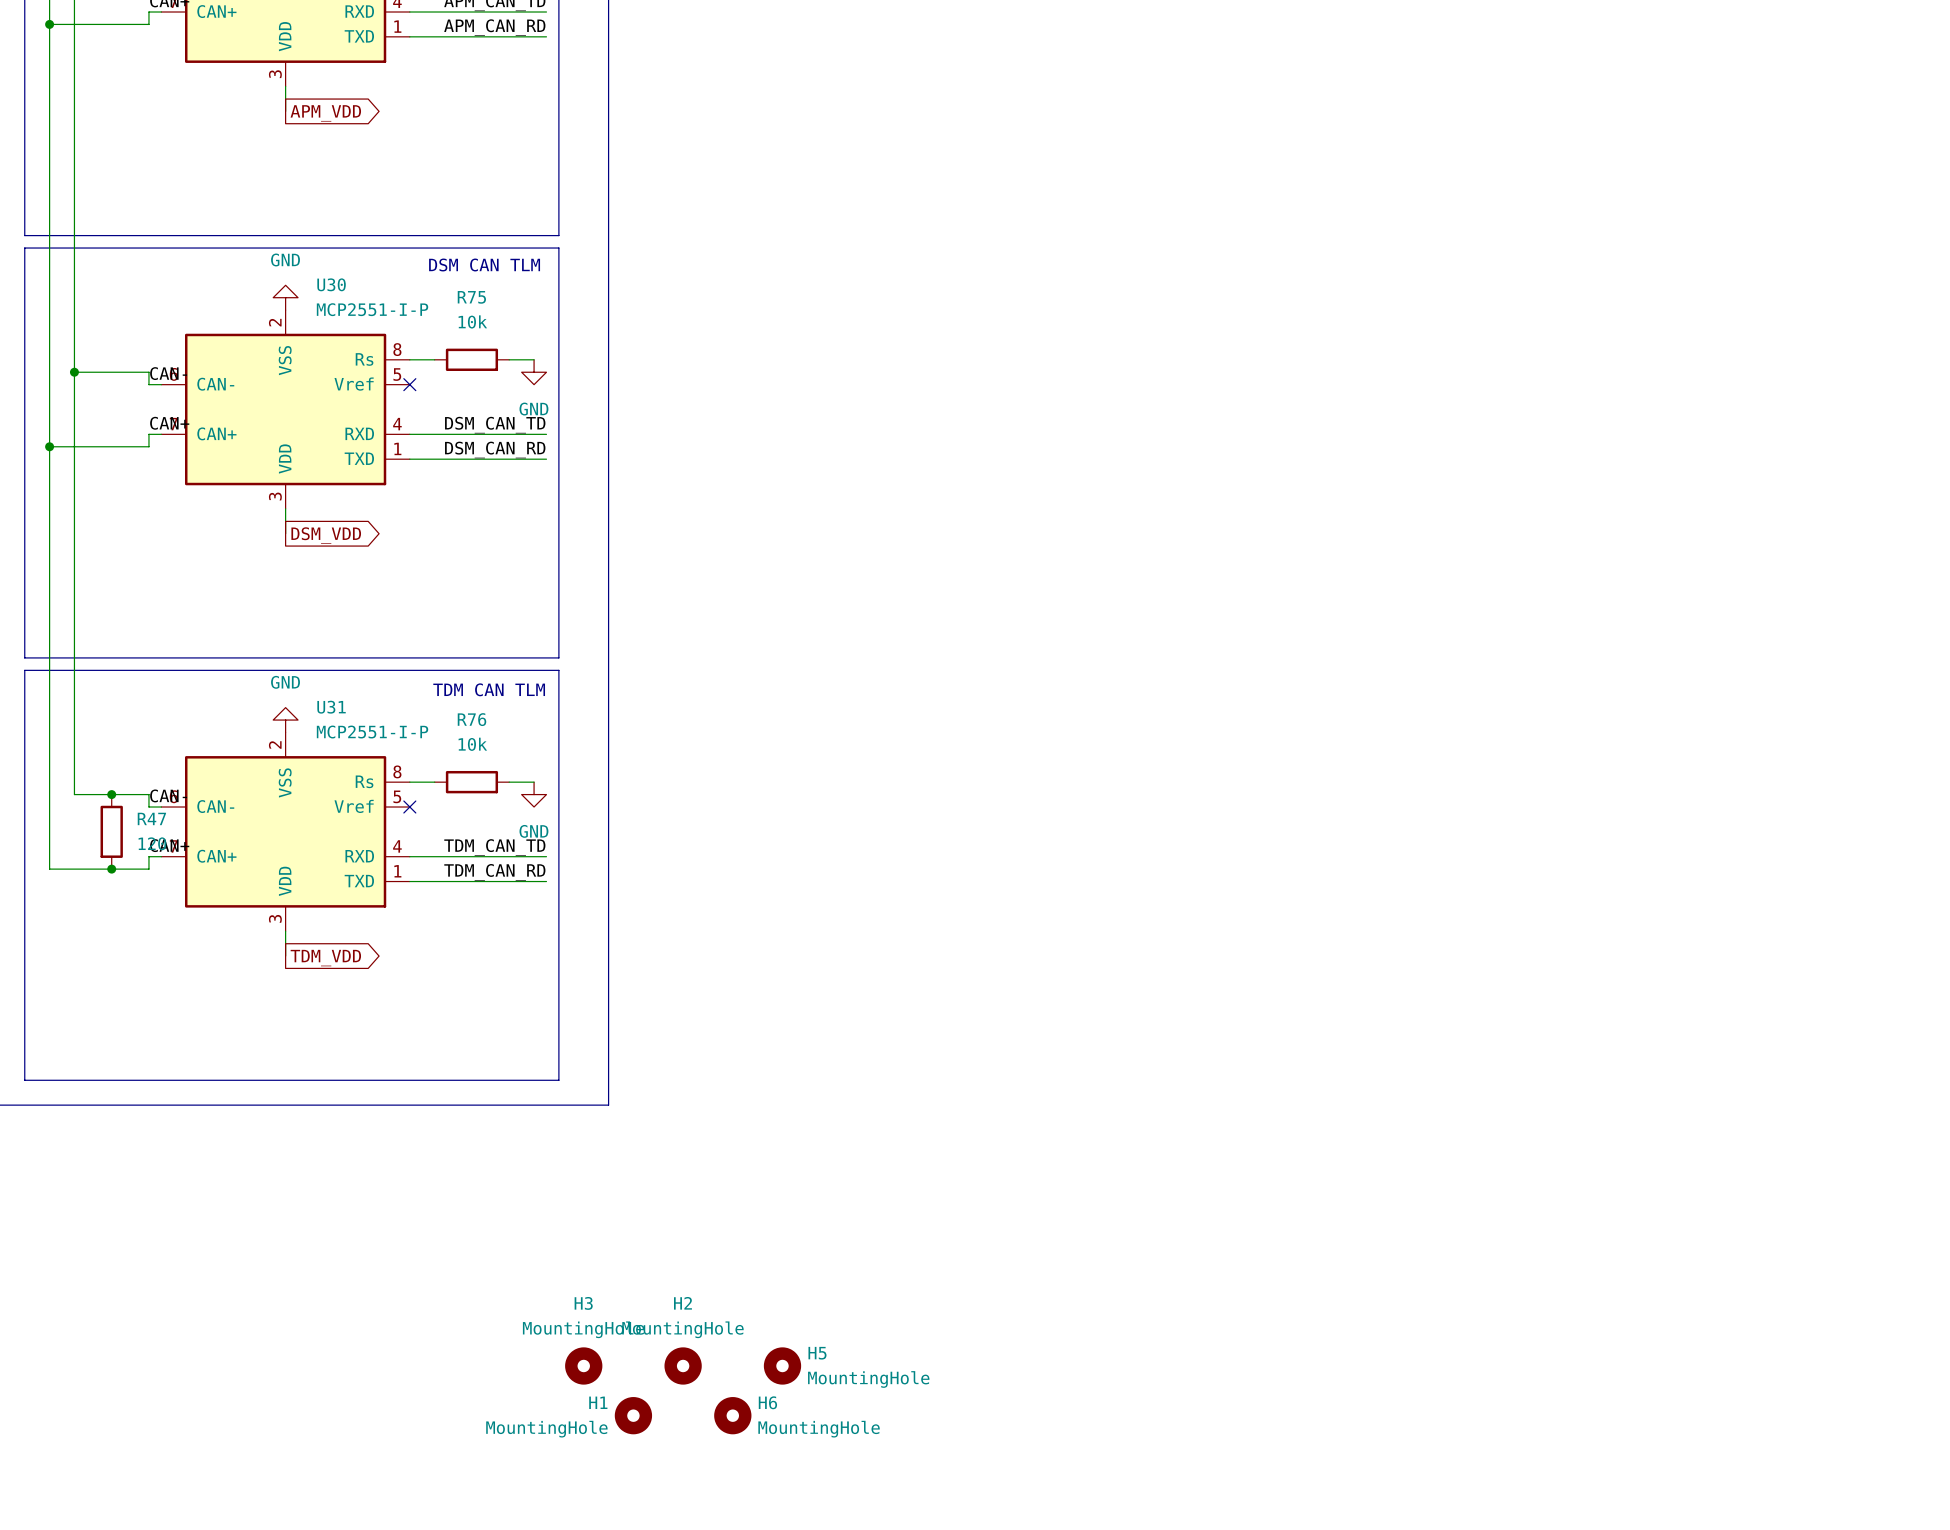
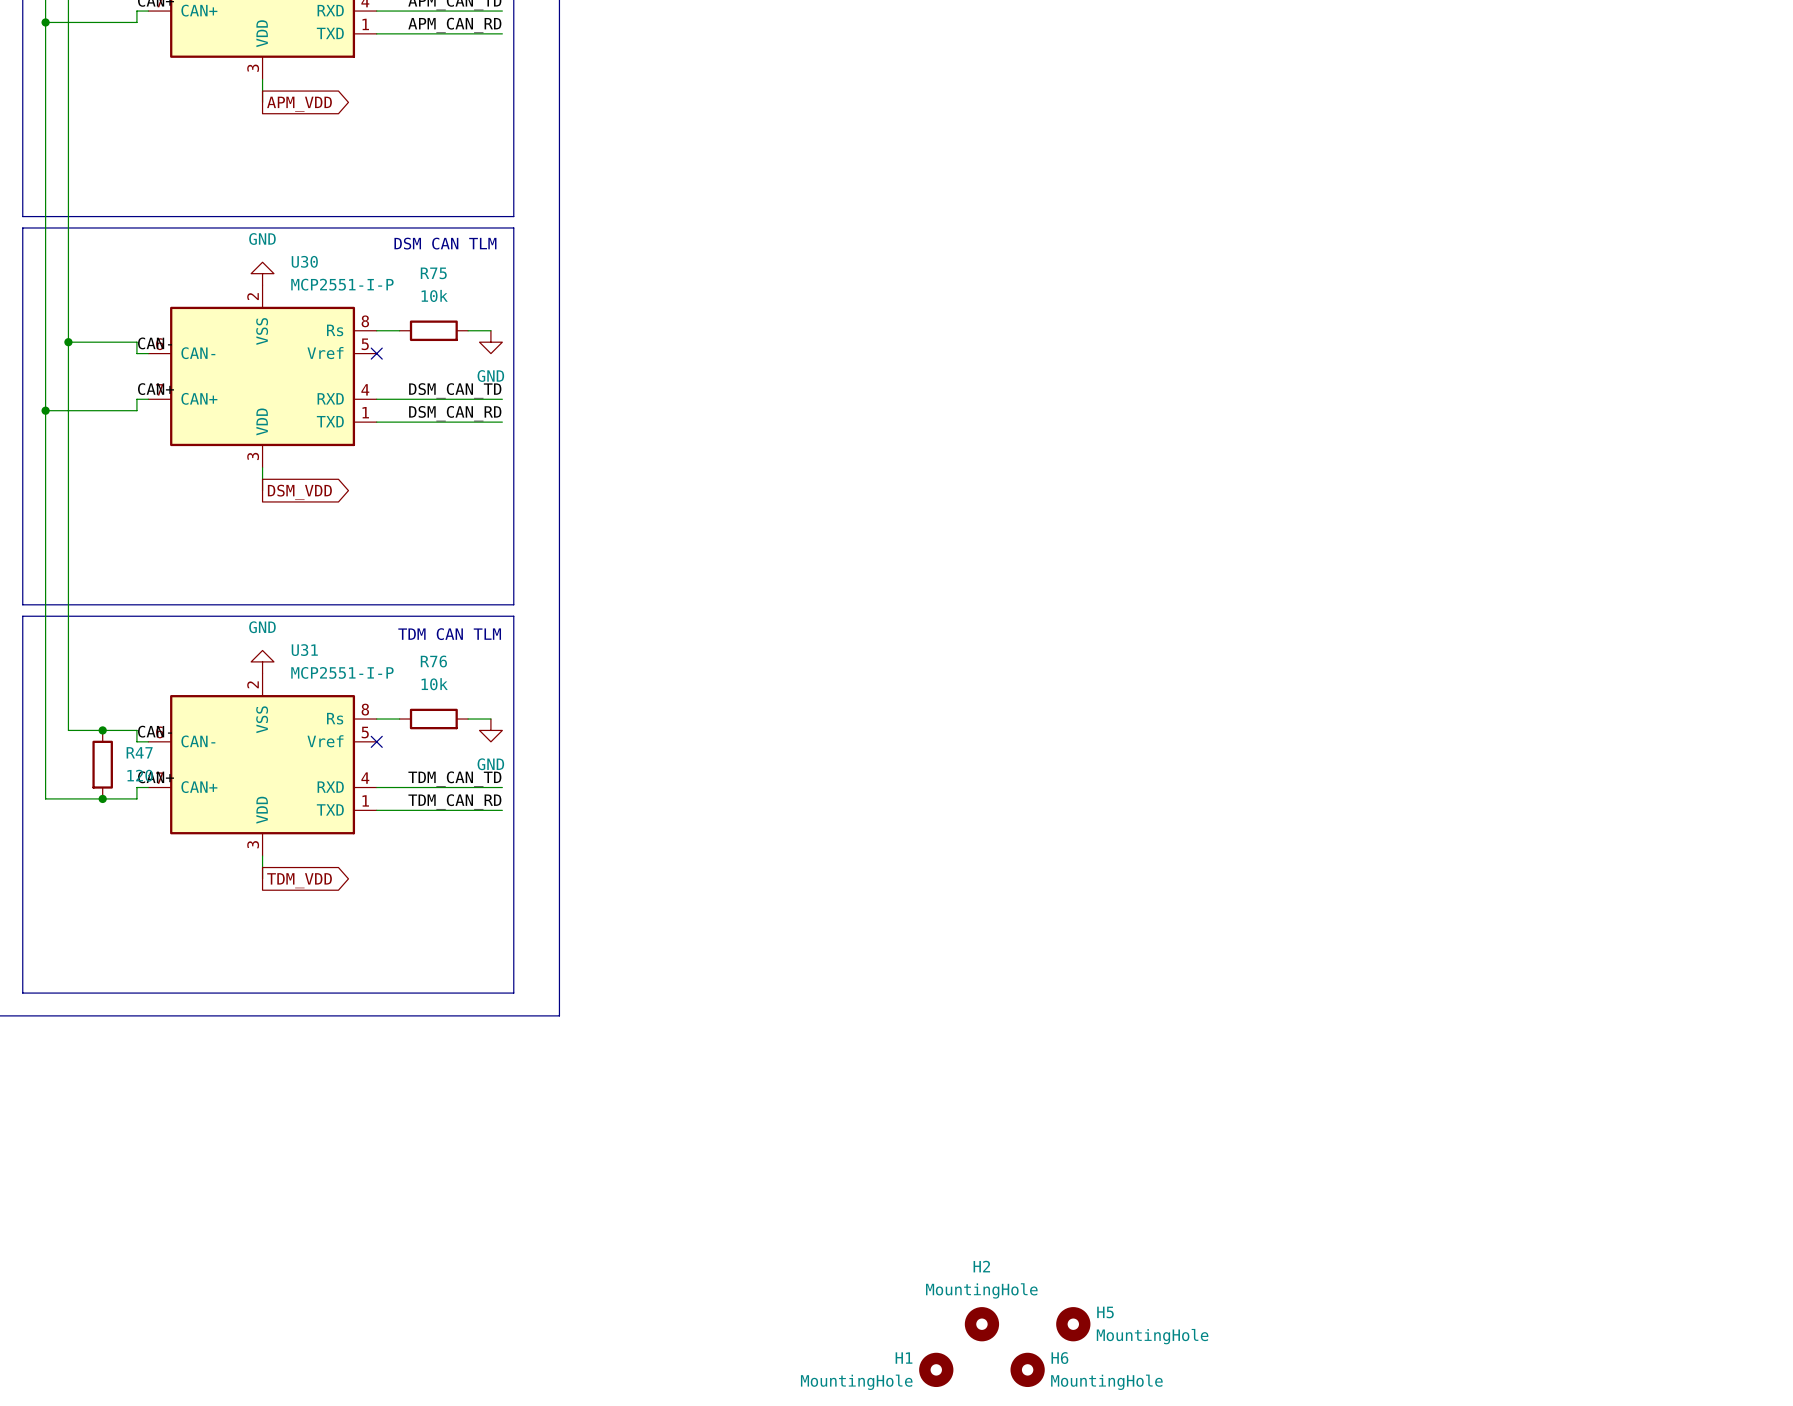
H3: MountingHole (583, 1365) -> none
H2 position: (683, 1365) -> (981, 1324)
H5 position: (782, 1365) -> (1073, 1324)
H1 position: (633, 1415) -> (936, 1369)
H6 position: (732, 1415) -> (1027, 1369)

